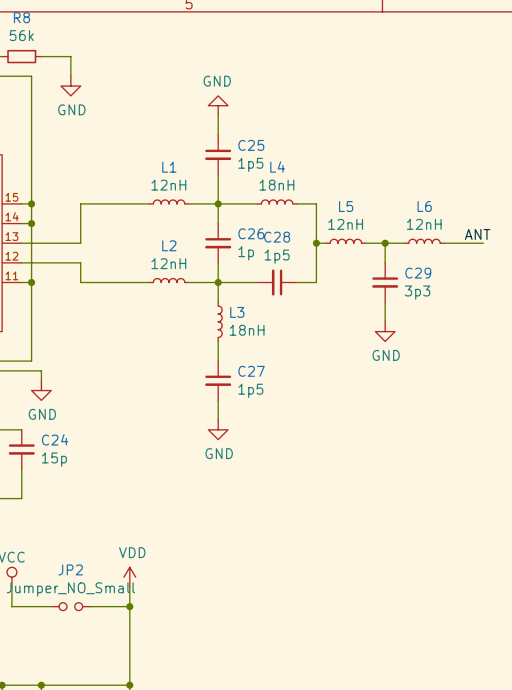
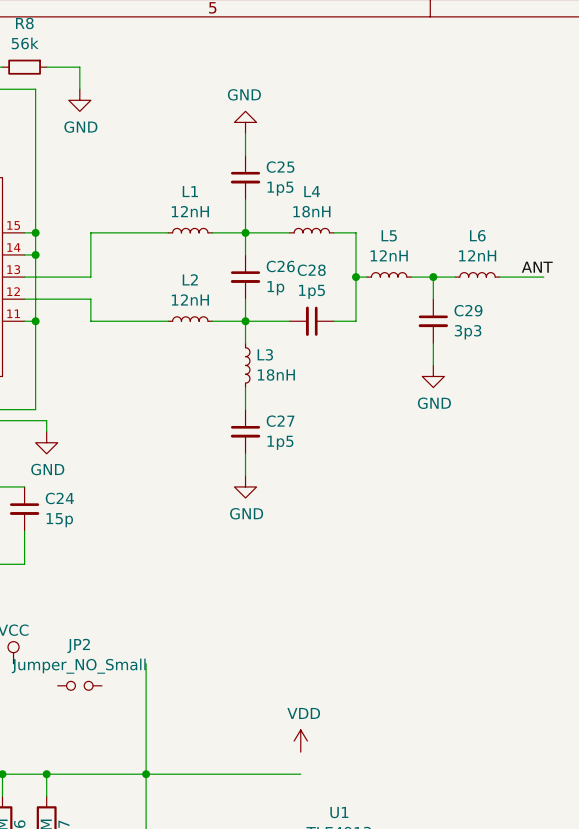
power symbol position: VDD (129, 577) -> VDD (300, 741)
wire: (11, 586) (11, 606) (51, 606) -> none
wire: (90, 606) (129, 606) -> none
junction: (129, 606) -> none
wire: none -> (146, 774) (300, 774)

